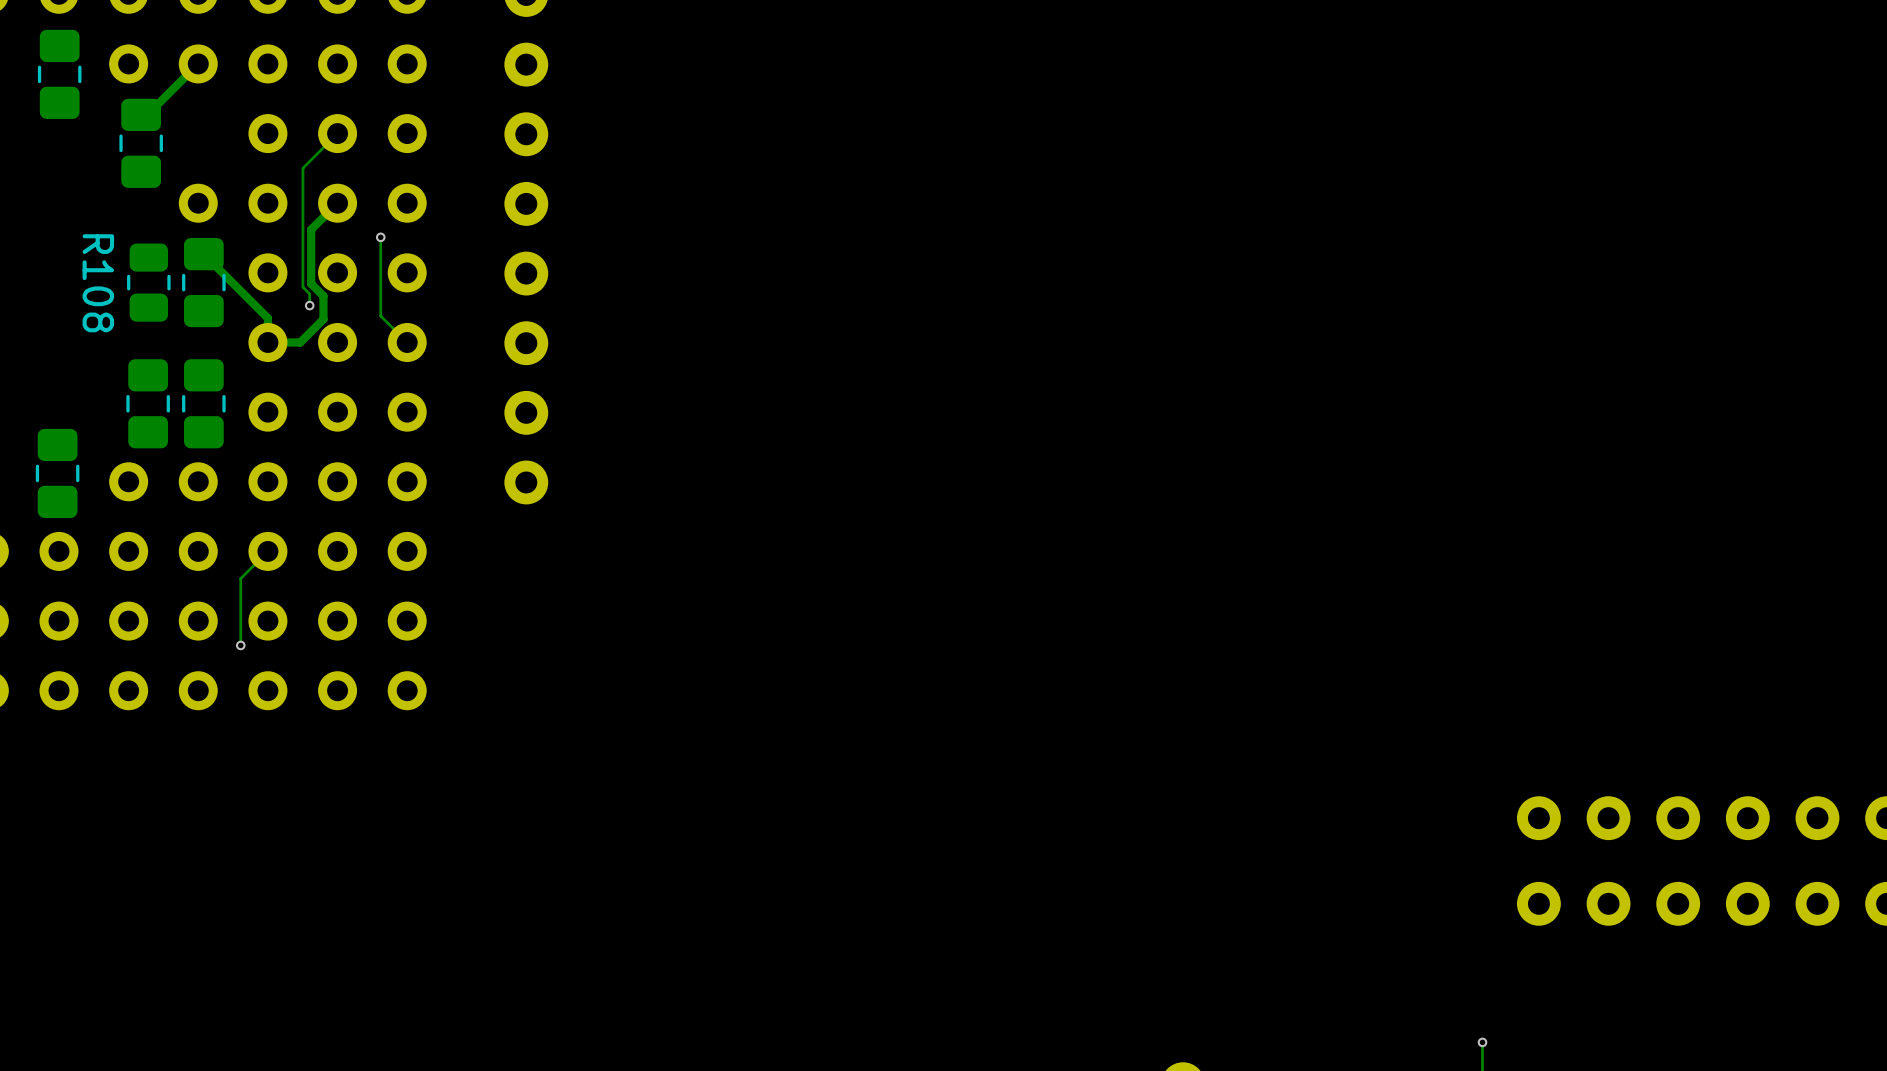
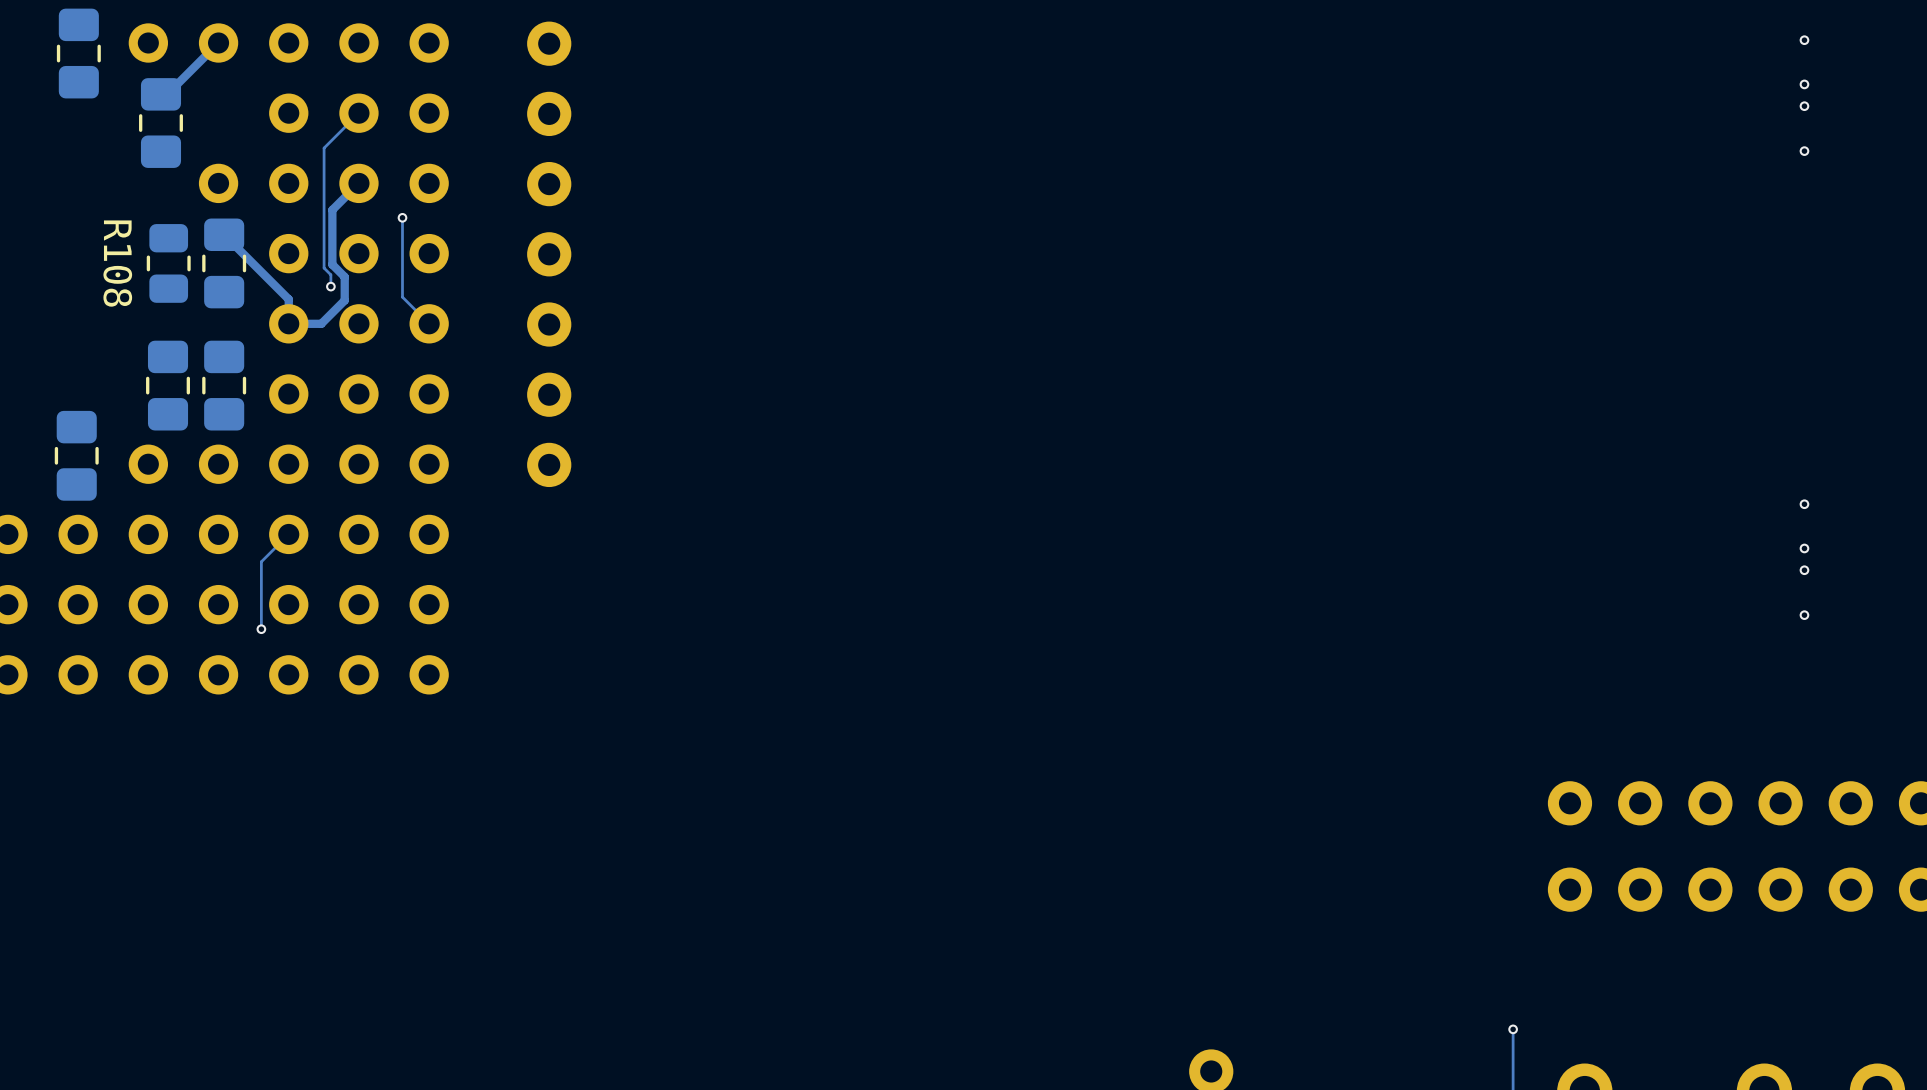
via: none -> (1804, 40)
via: none -> (1804, 84)
via: none -> (1804, 106)
via: none -> (1804, 151)
via: none -> (1804, 504)
via: none -> (1804, 548)
via: none -> (1804, 570)
via: none -> (1804, 615)

